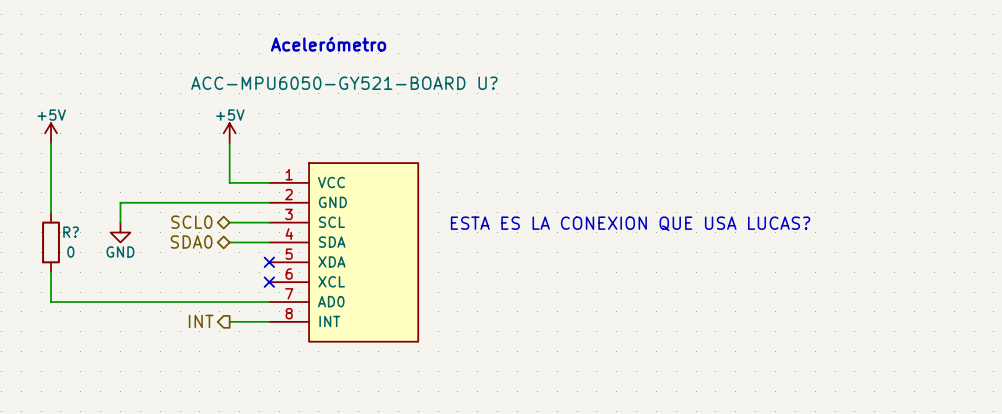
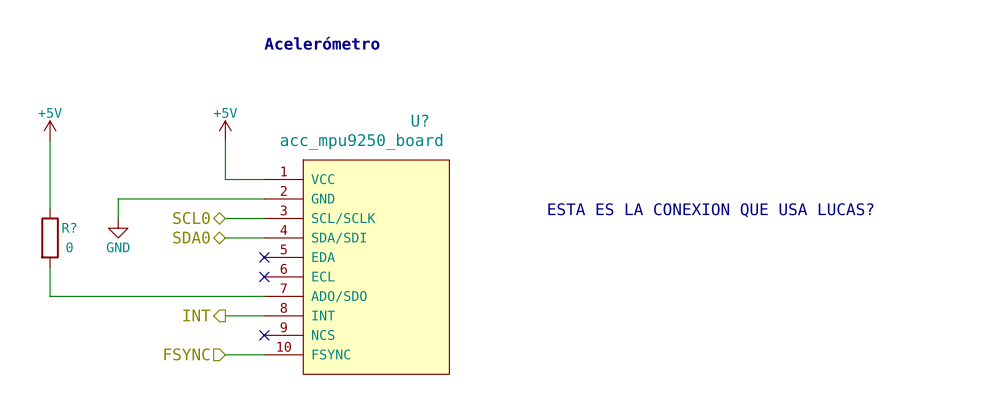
text position: ESTA ES LA CONEXION QUE USA LUCAS? (630, 223) -> ESTA ES LA CONEXION QUE USA LUCAS? (710, 210)
U?: ACC-MPU6050-GY521-BOARD (343, 252) -> none
U?: none -> acc_mpu9250_board (356, 267)
no-connect mark: none -> (264, 335)
hierarchical label: none -> FSYNC (186, 354)
wire: none -> (225, 354) (264, 354)

